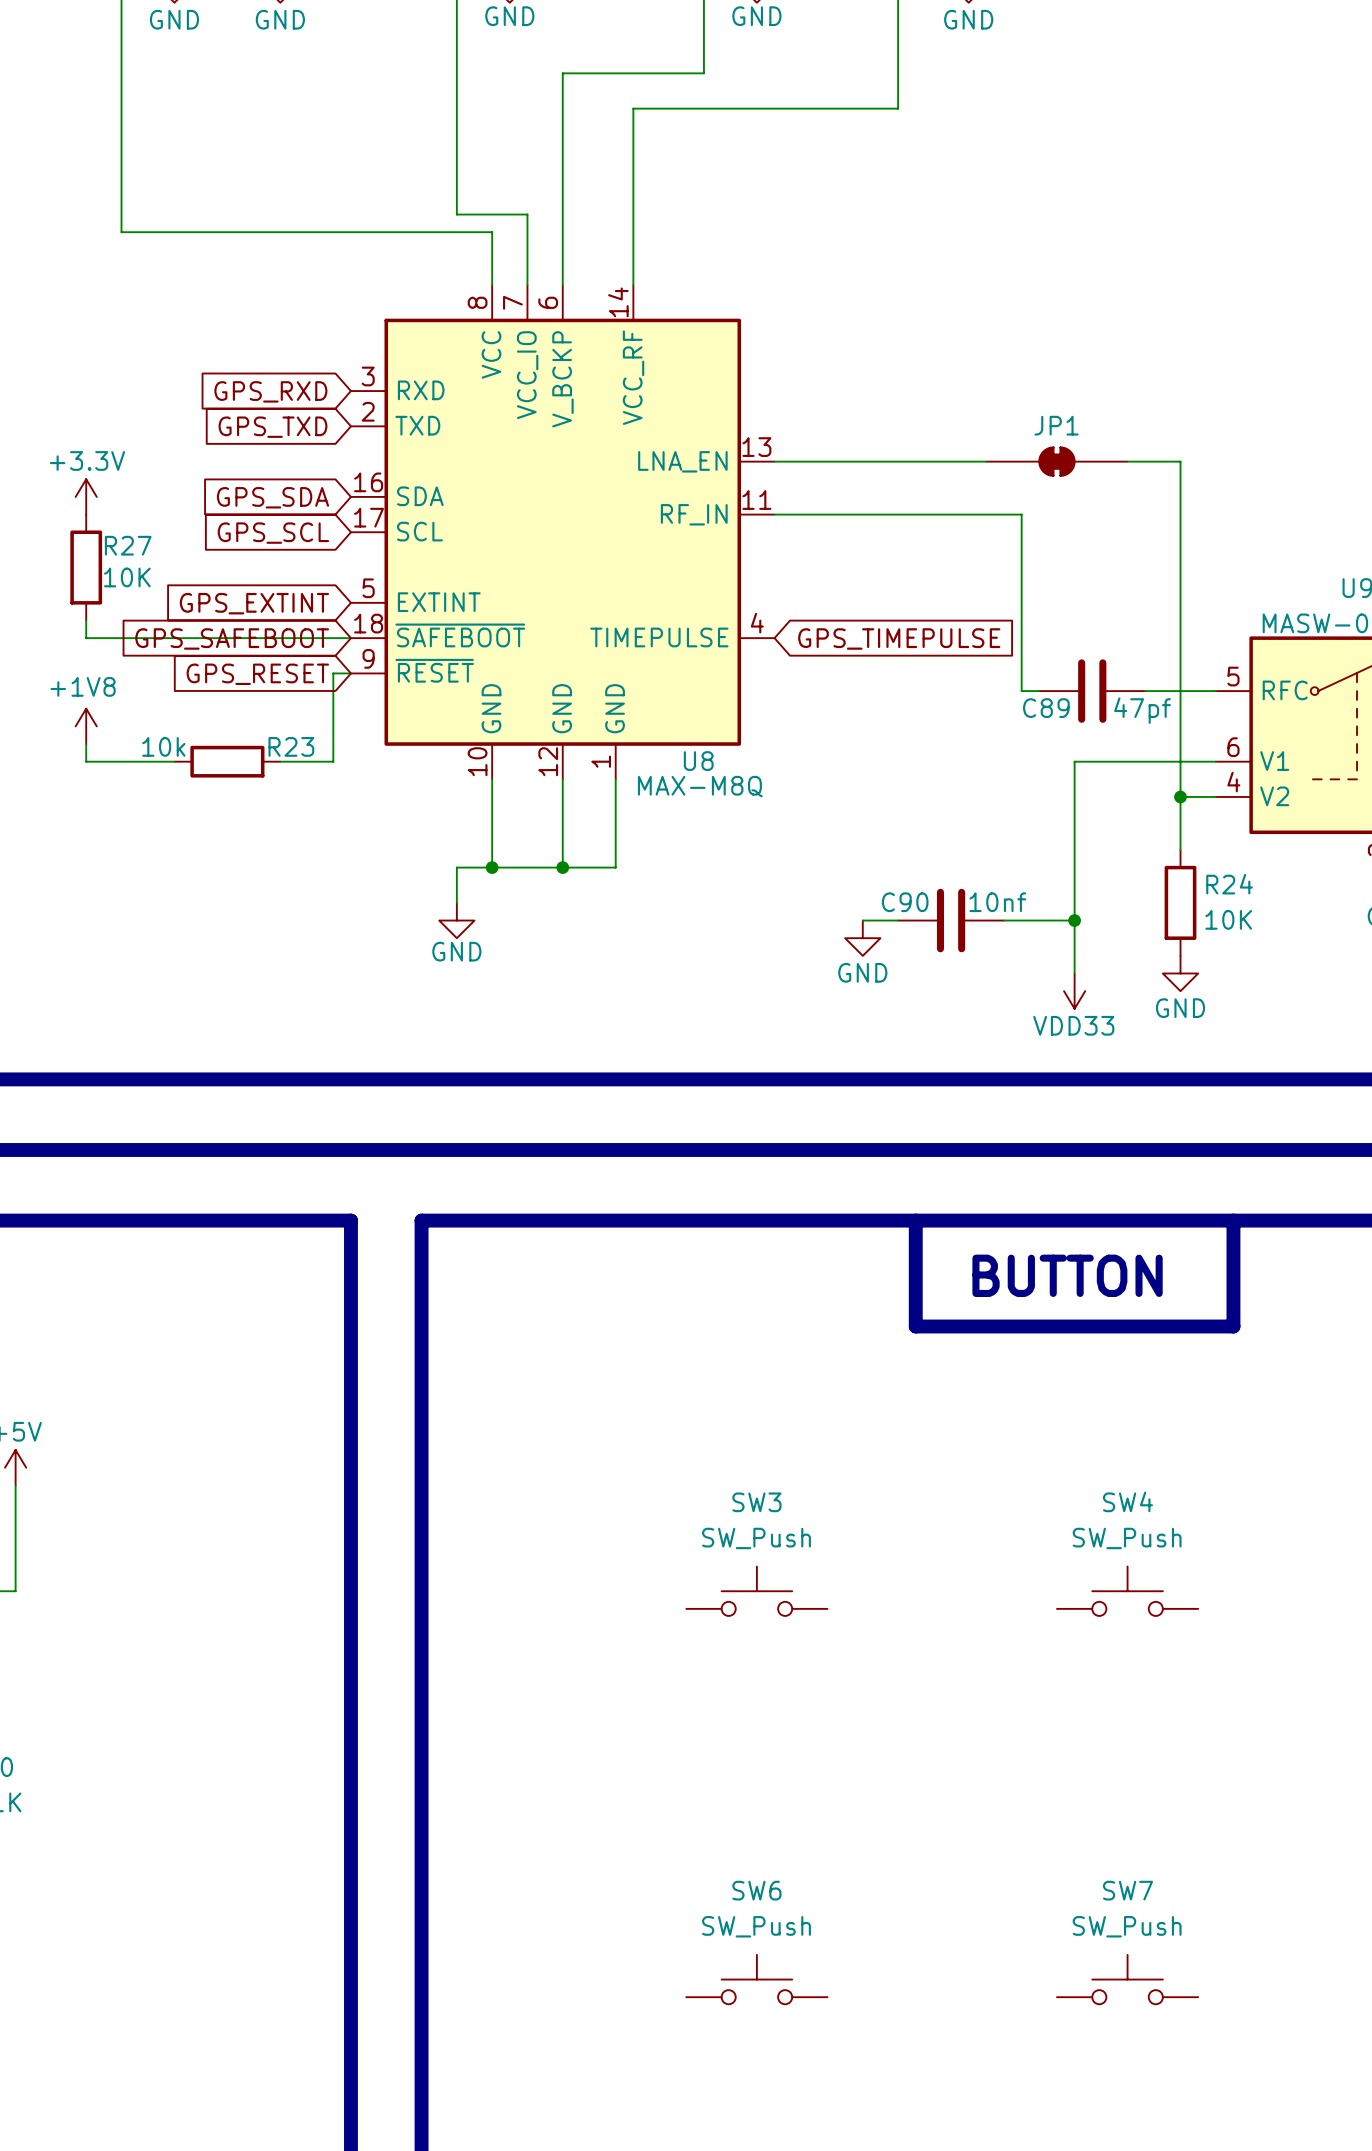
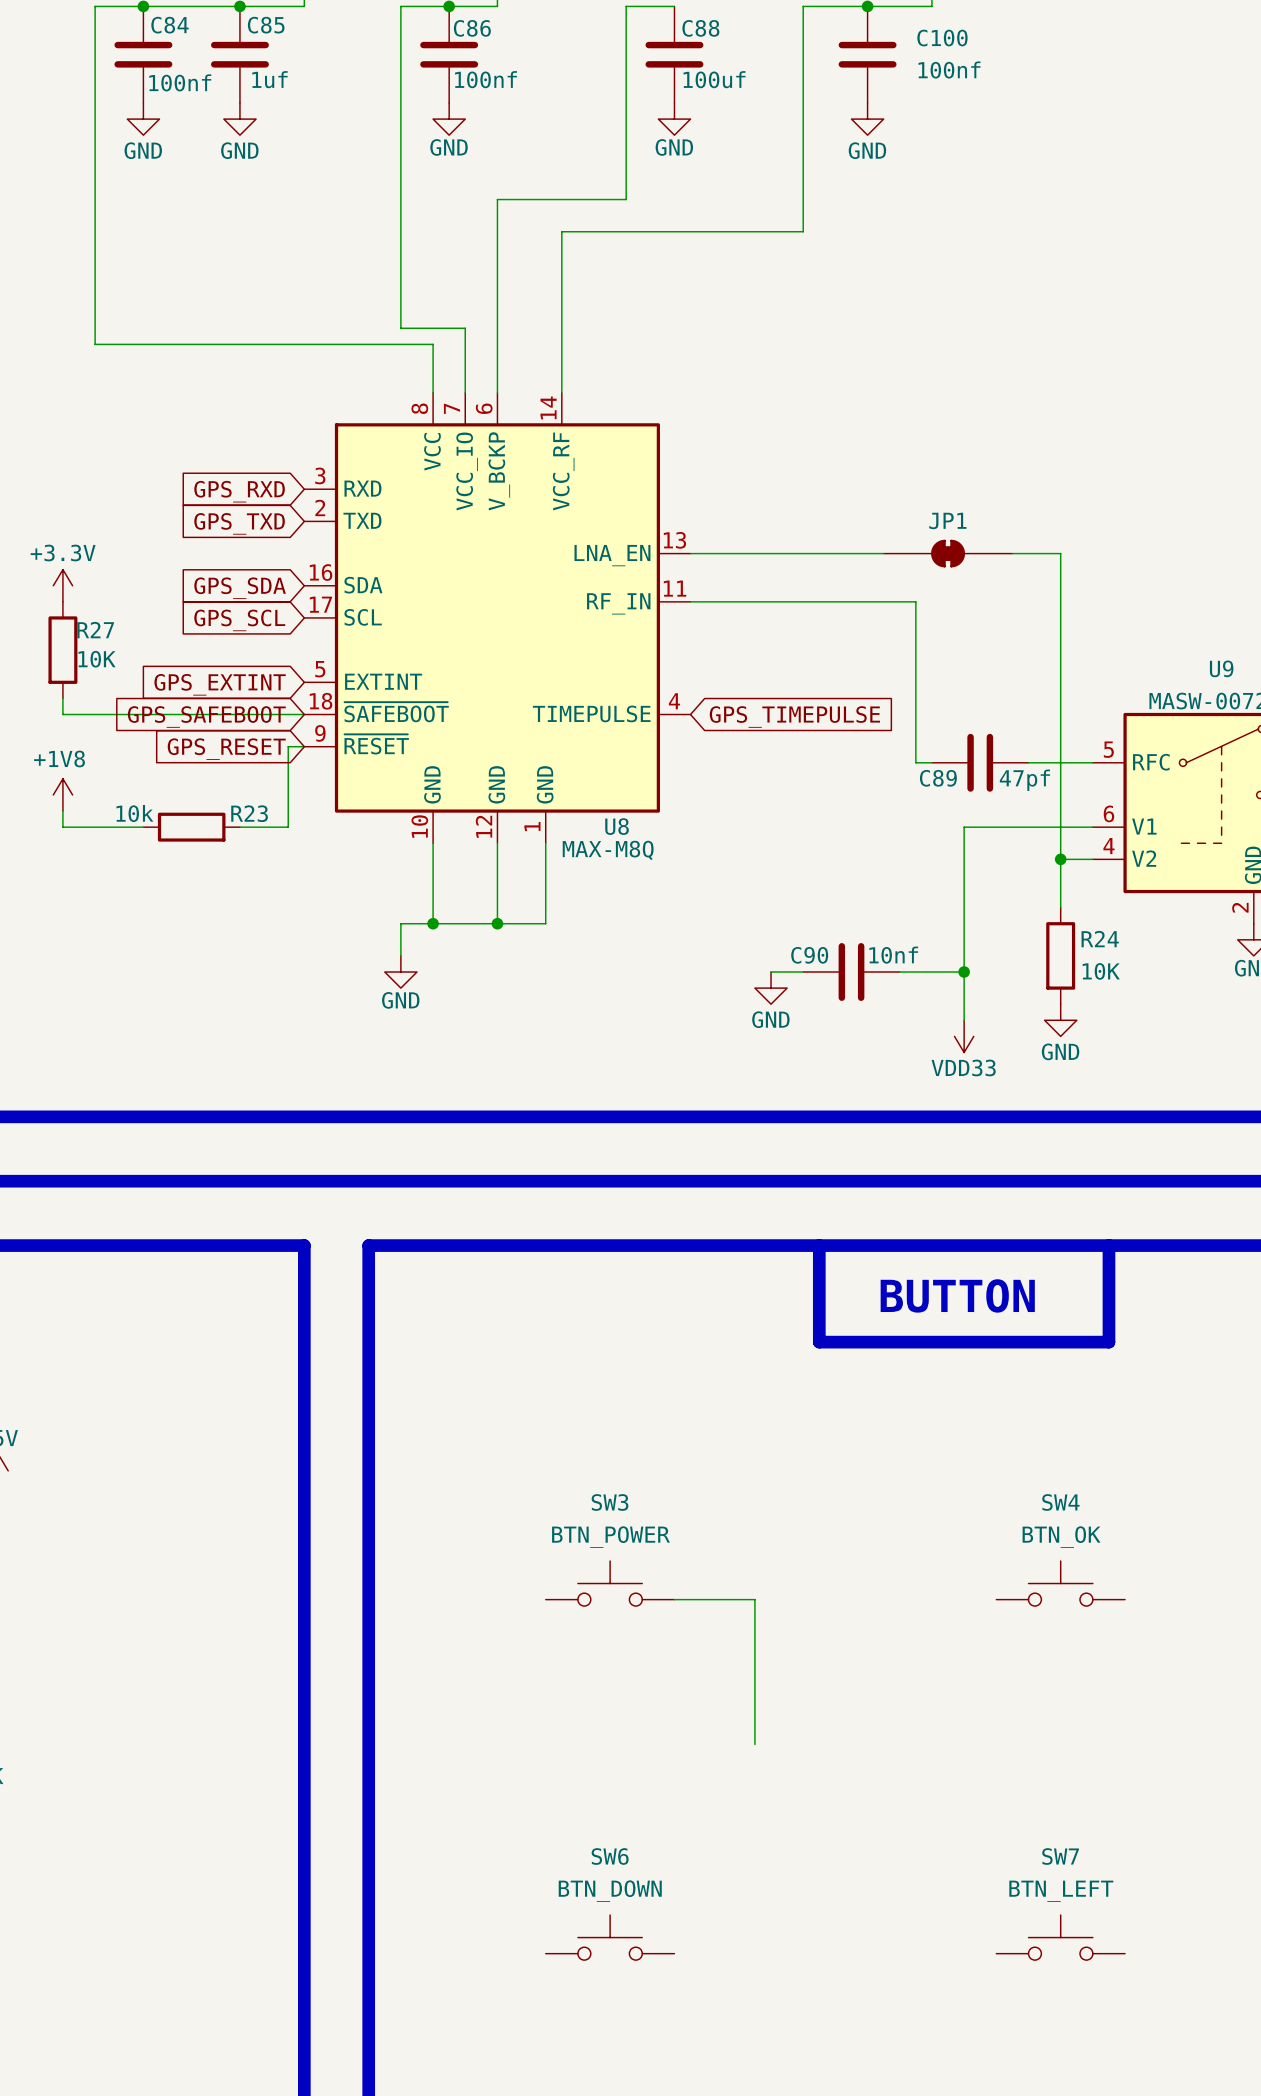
SW3 value: SW_Push (756, 1538) -> BTN_POWER (610, 1537)
SW4 value: SW_Push (1127, 1538) -> BTN_OK (1061, 1537)
SW3 position: (756, 1591) -> (610, 1583)
SW4 position: (1127, 1591) -> (1060, 1583)
wire: none -> (674, 1599) (754, 1599) (754, 1744)
SW6 value: SW_Push (756, 1926) -> BTN_DOWN (610, 1891)
SW7 value: SW_Push (1127, 1926) -> BTN_LEFT (1061, 1891)
SW6 position: (756, 1979) -> (610, 1937)
SW7 position: (1127, 1979) -> (1060, 1937)

